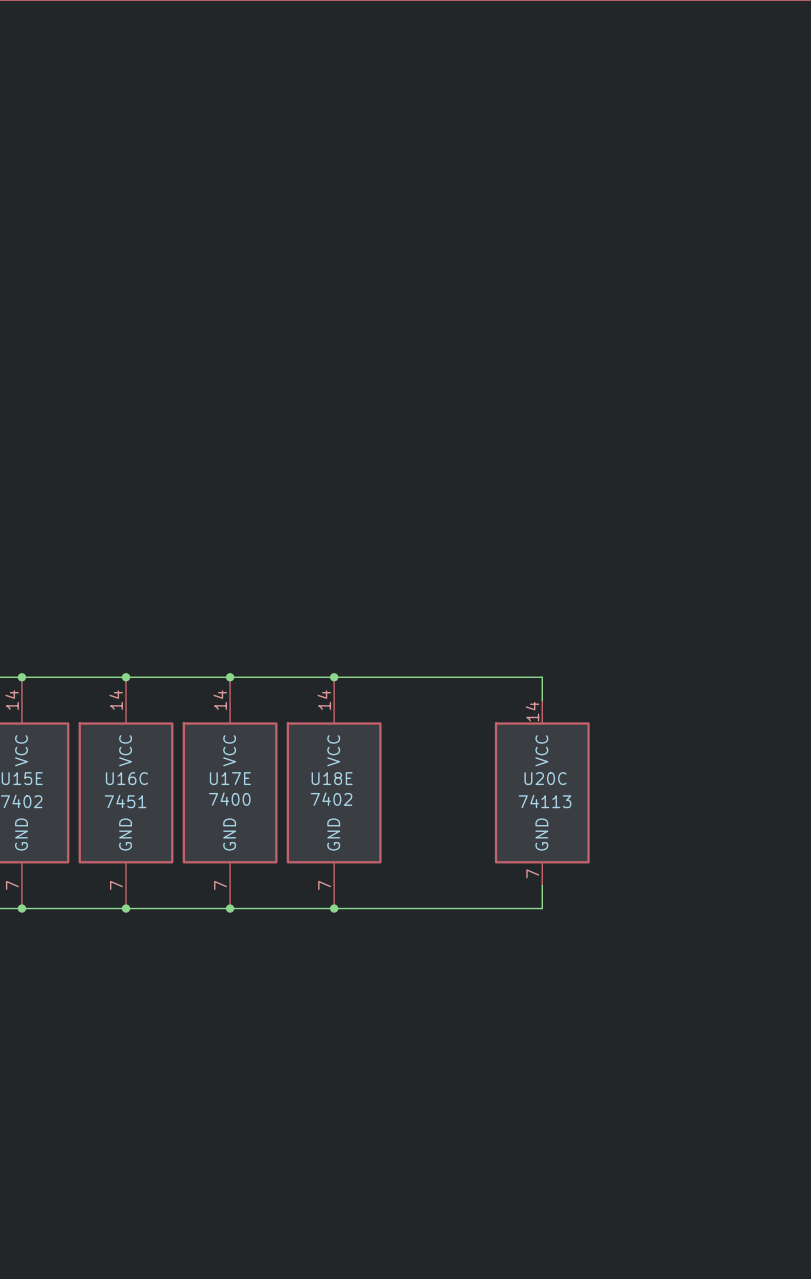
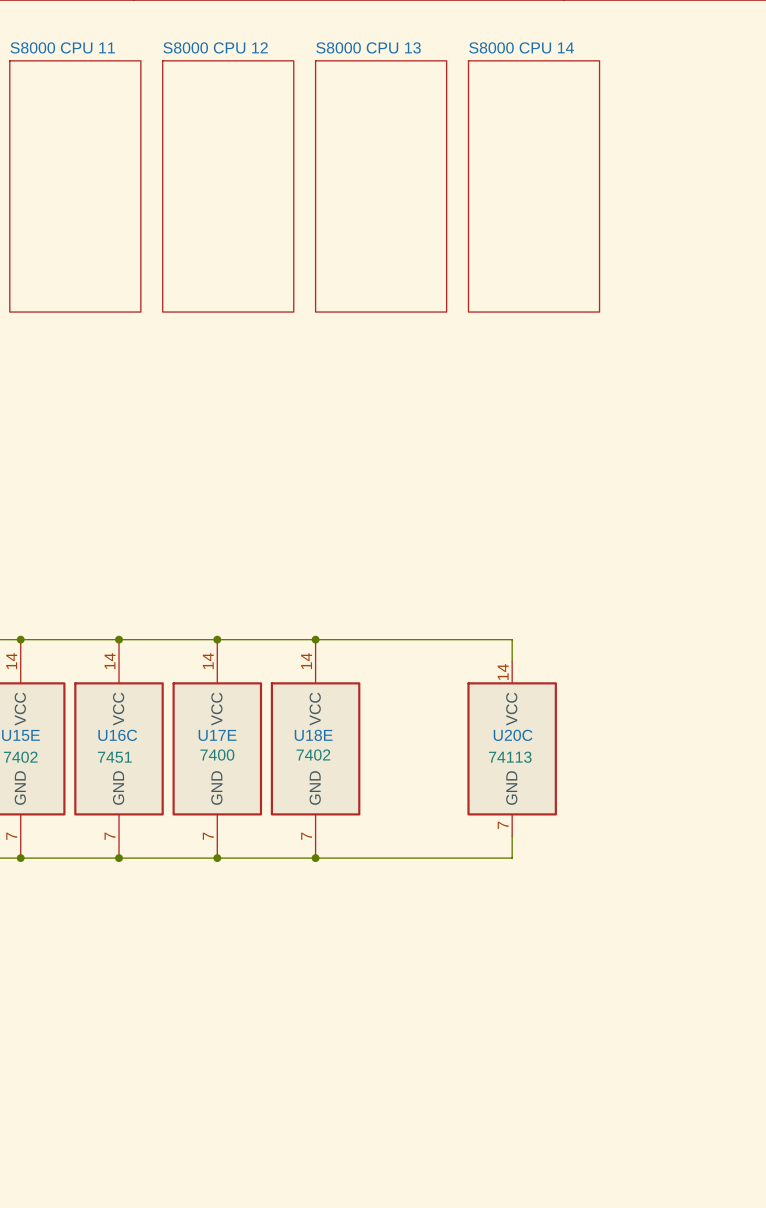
sheet S8000 CPU 11: none -> (75, 186)
sheet S8000 CPU 12: none -> (228, 186)
sheet S8000 CPU 13: none -> (381, 186)
sheet S8000 CPU 14: none -> (534, 186)

